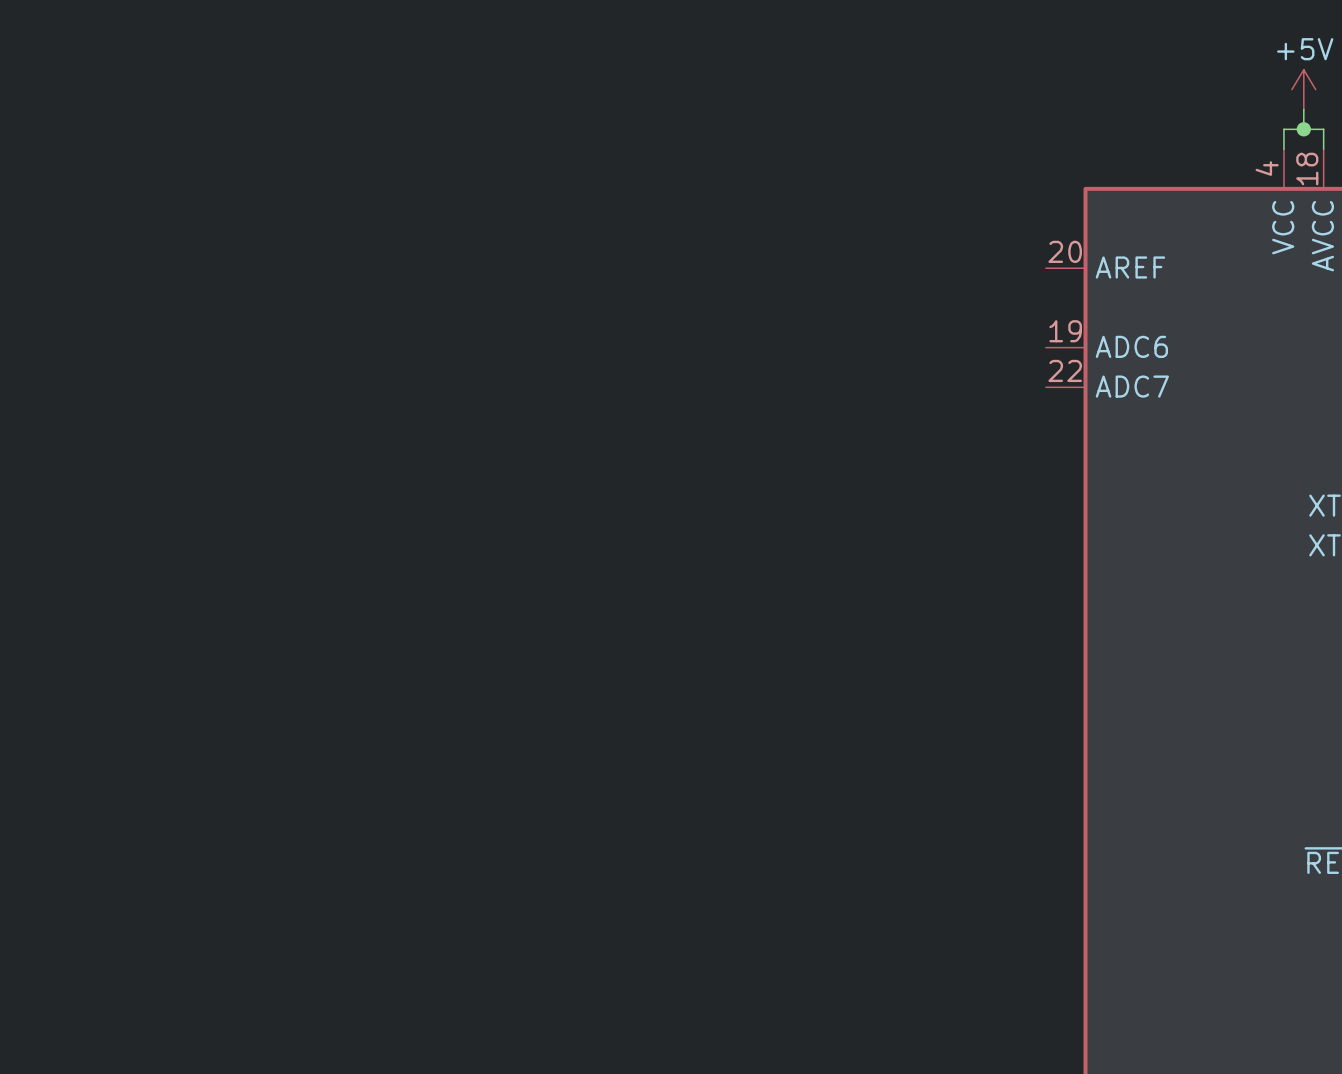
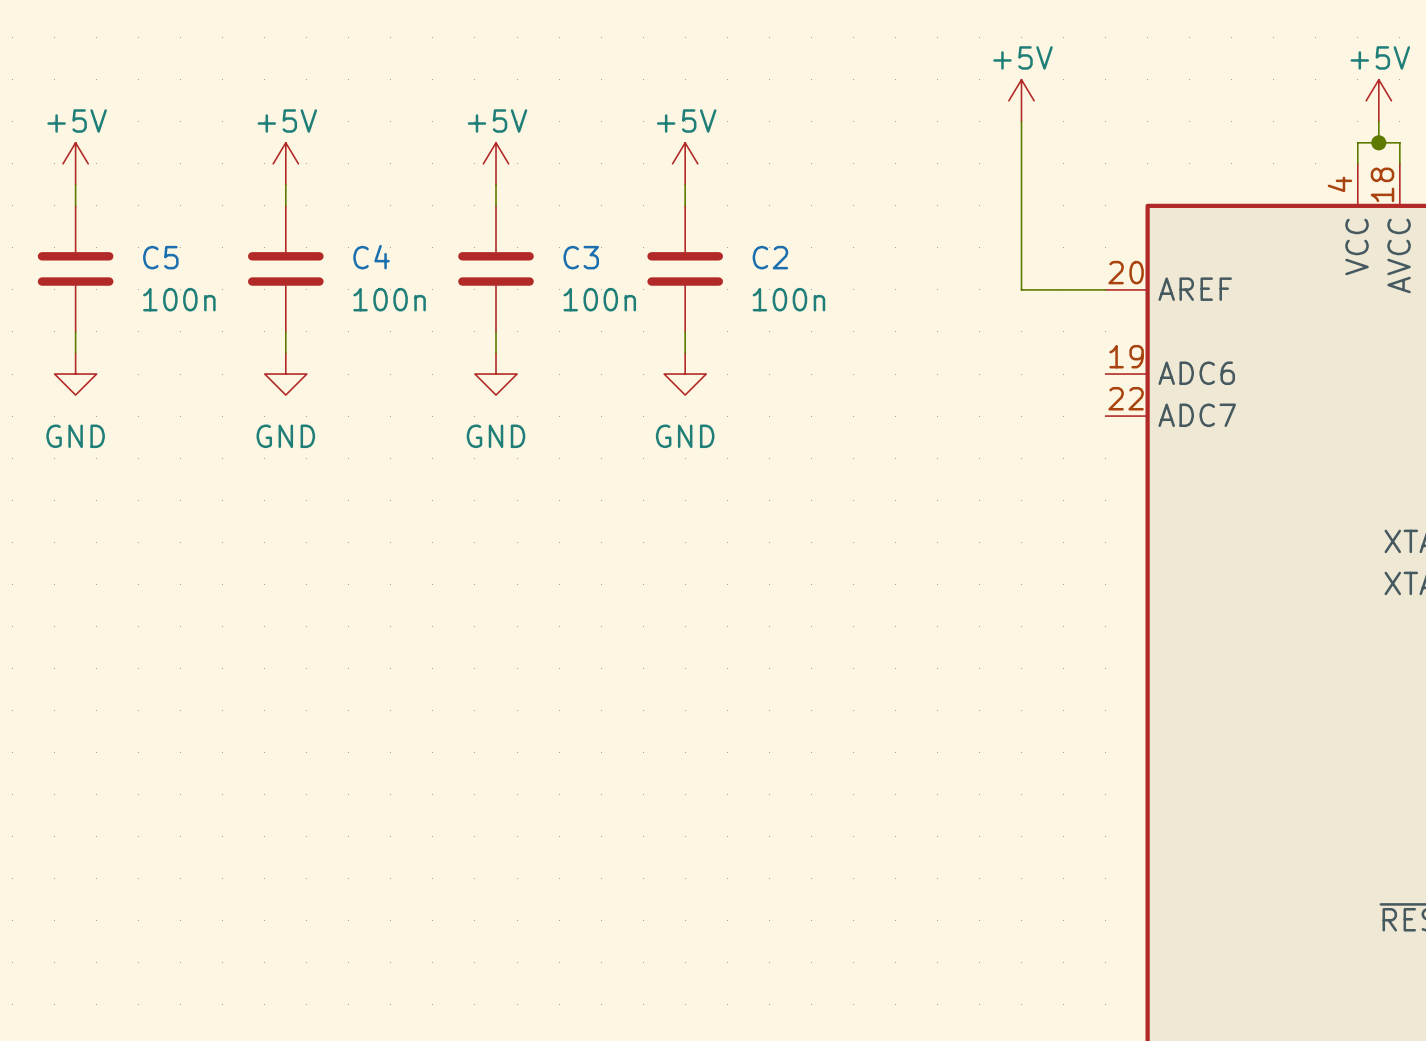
power symbol: none -> +5V (1021, 100)
wire: none -> (1021, 121) (1021, 289) (1105, 289)
power symbol: none -> +5V (75, 163)
power symbol: none -> +5V (285, 163)
power symbol: none -> +5V (496, 163)
power symbol: none -> +5V (685, 163)
wire: none -> (75, 184) (75, 205)
wire: none -> (285, 184) (285, 205)
wire: none -> (496, 184) (496, 205)
wire: none -> (685, 184) (685, 205)
C5: none -> 100n (75, 268)
C4: none -> 100n (285, 268)
C3: none -> 100n (496, 268)
C2: none -> 100n (685, 268)
wire: none -> (75, 331) (75, 353)
wire: none -> (285, 331) (285, 353)
wire: none -> (496, 331) (496, 353)
wire: none -> (685, 331) (685, 353)
power symbol: none -> GND (75, 374)
power symbol: none -> GND (285, 374)
power symbol: none -> GND (496, 374)
power symbol: none -> GND (685, 374)

